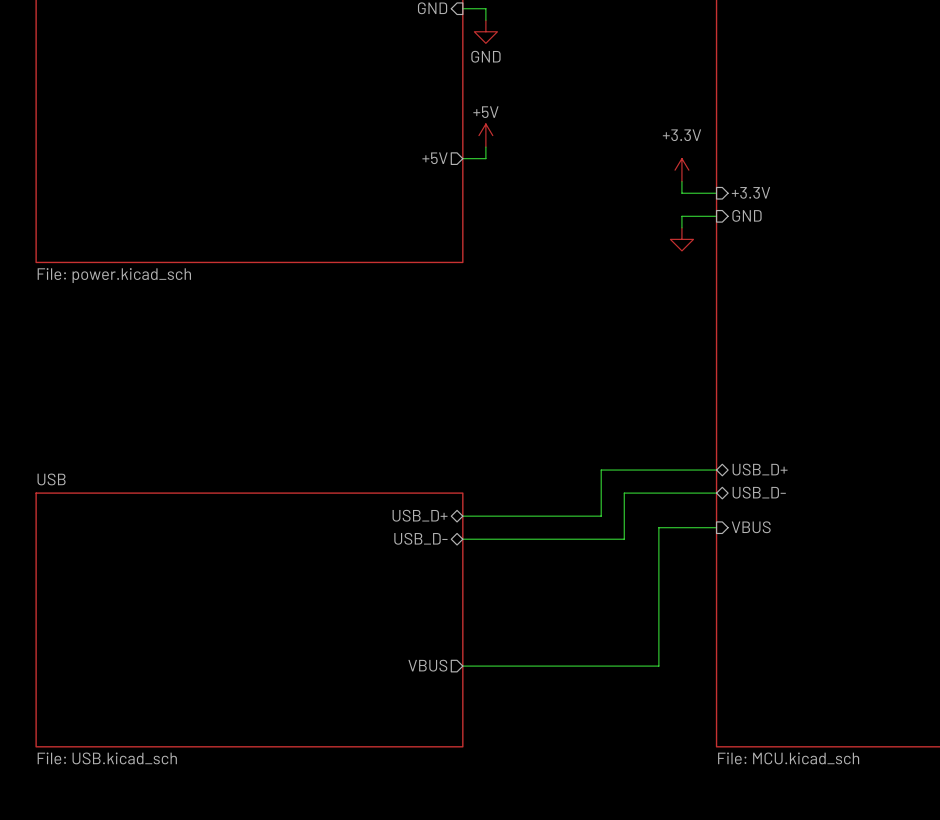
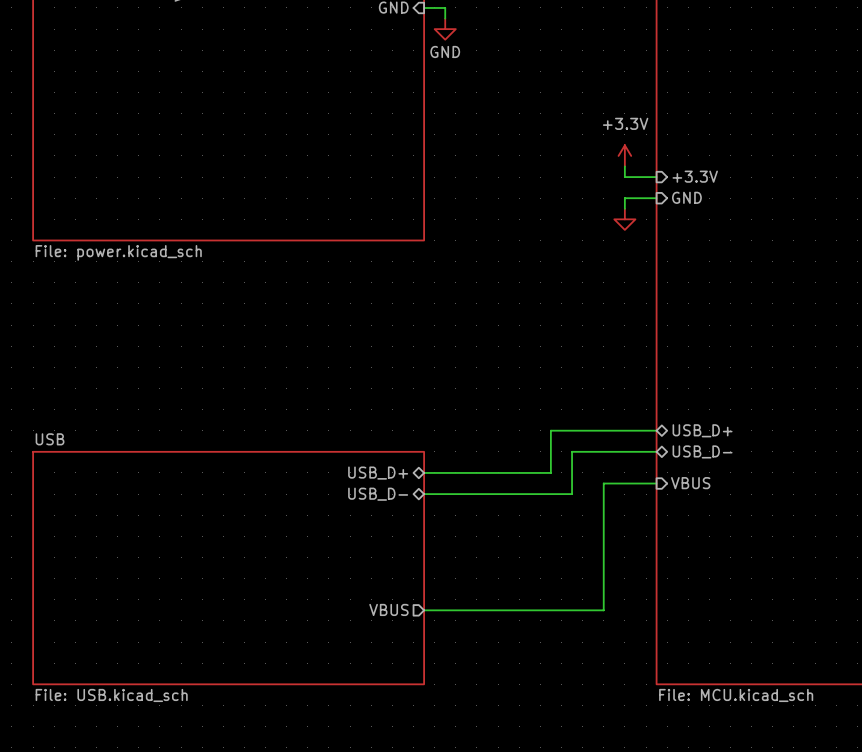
power symbol: +5V (485, 135) -> none
wire: (485, 147) (485, 158) (462, 158) -> none
sheet pin: +5V (435, 158) -> none

